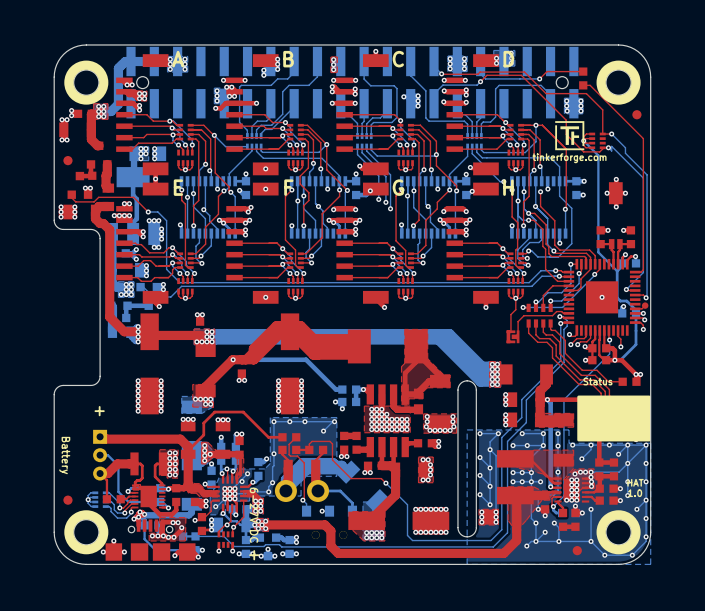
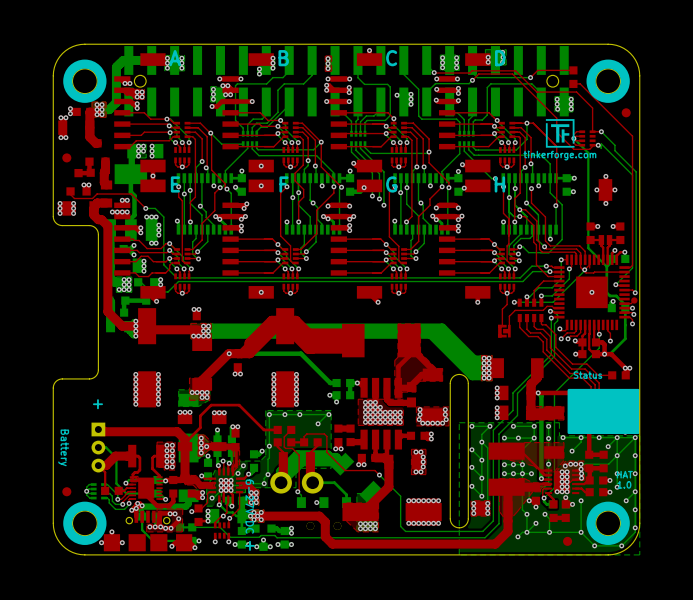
top track: (590, 269) (580, 278) (580, 287) (577, 290) (568, 290) -> (580, 264) (580, 267) (586, 272) (624, 272)

